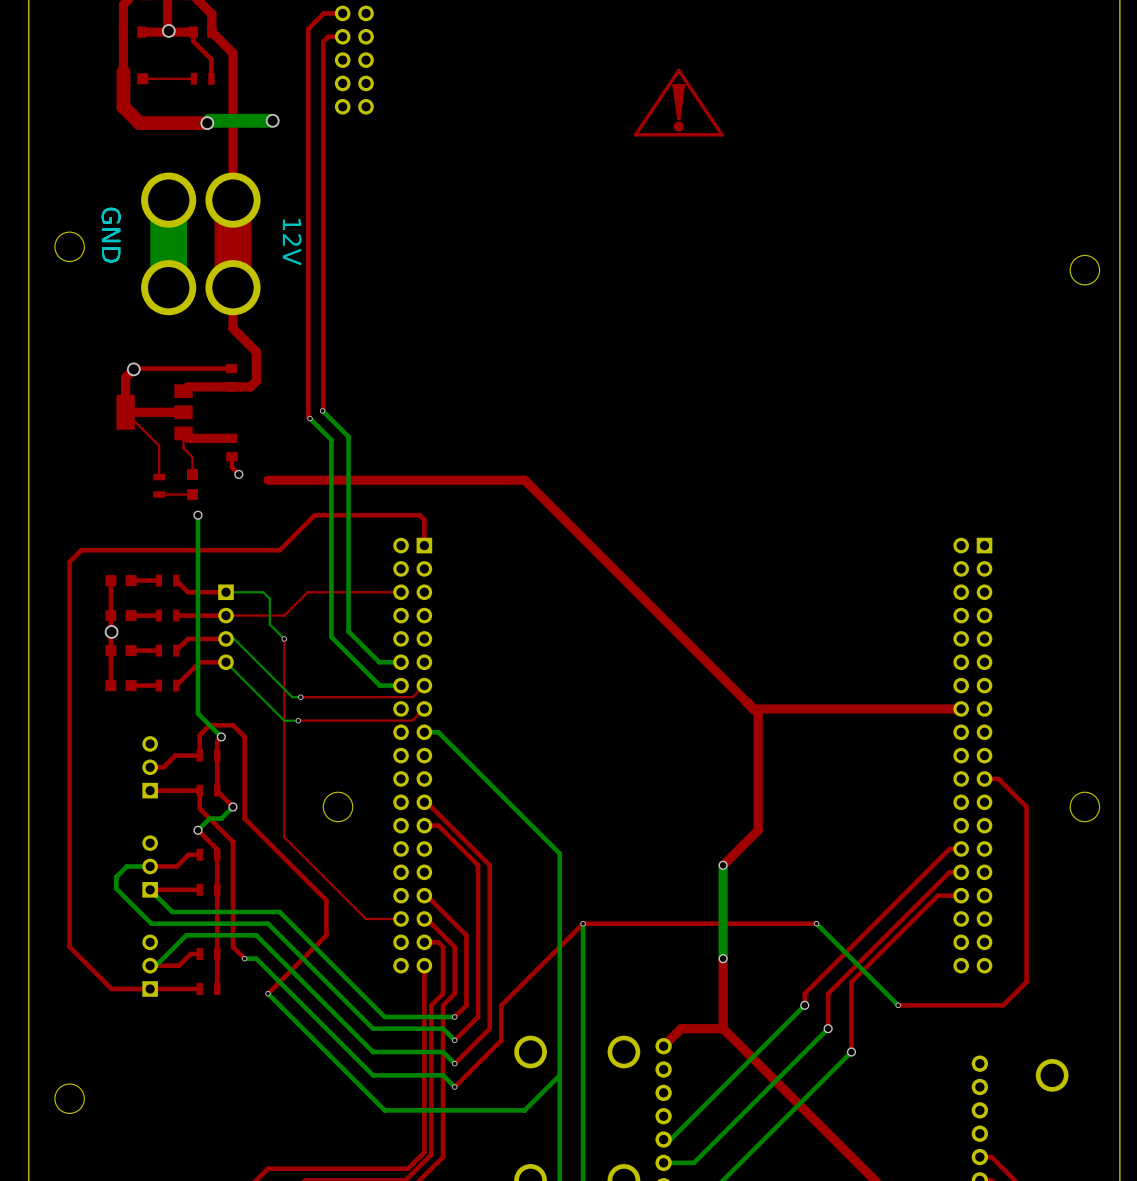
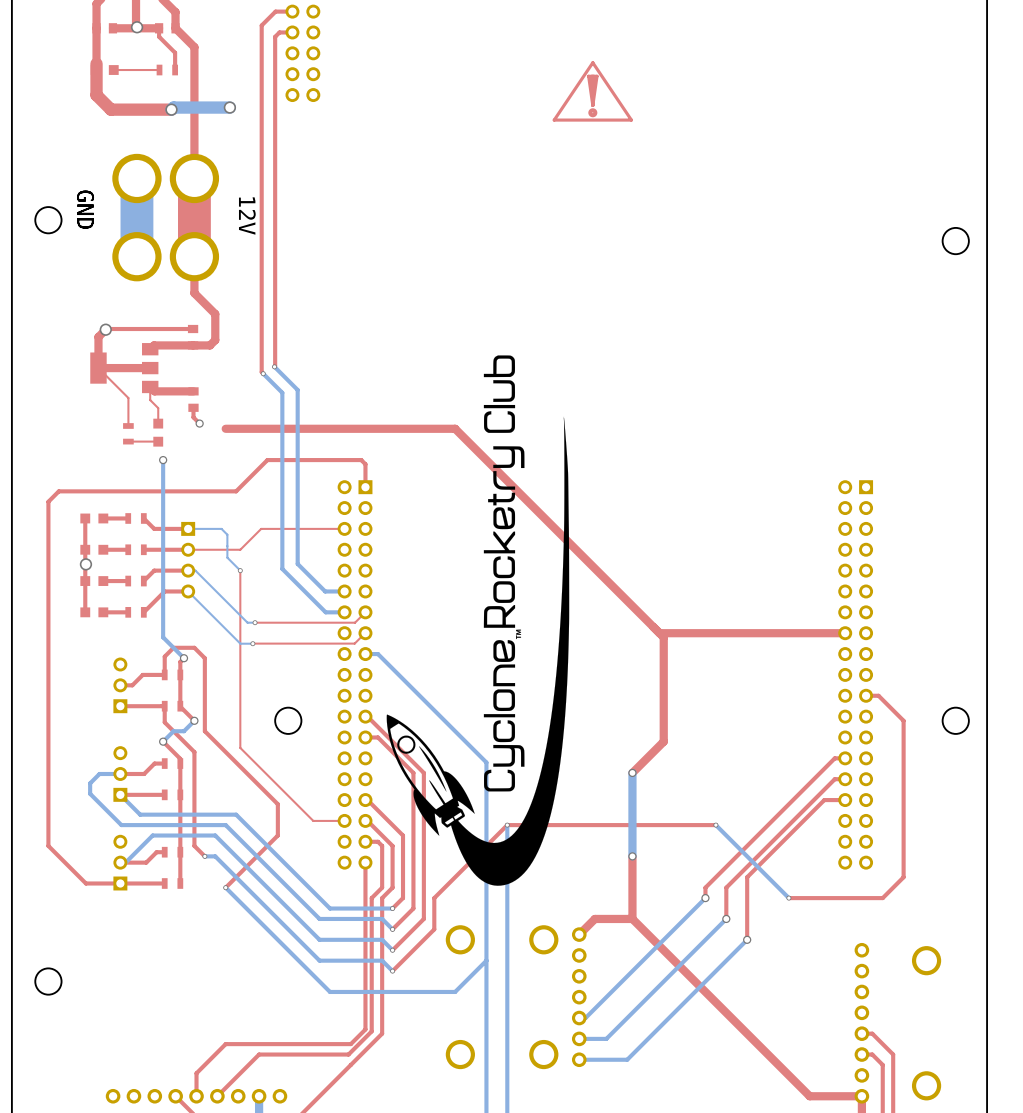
drawing: none -> [386, 355, 570, 886]

